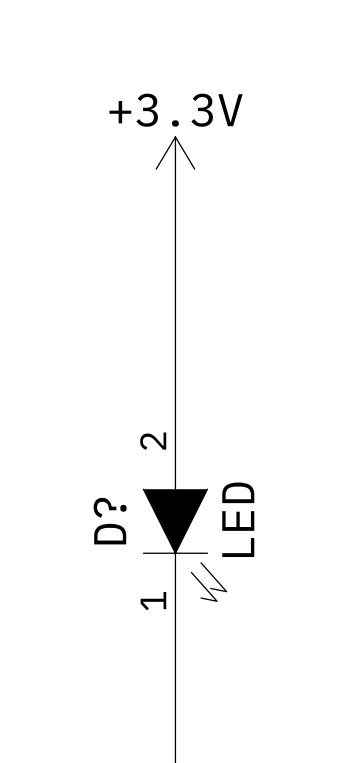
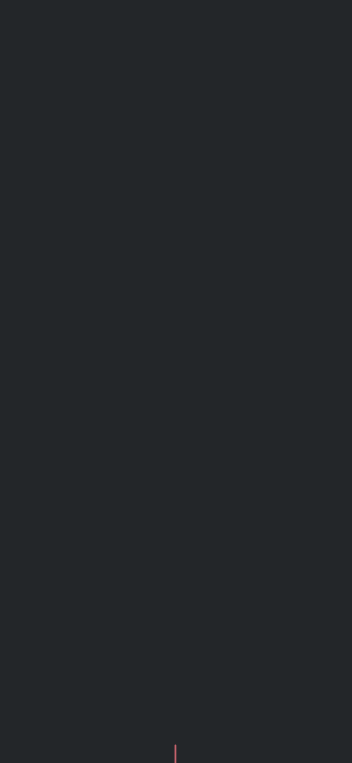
power symbol: +3.3V (175, 169) -> none
wire: (175, 201) (175, 393) -> none
D?: LED (185, 521) -> none
wire: (175, 649) (175, 745) -> none

